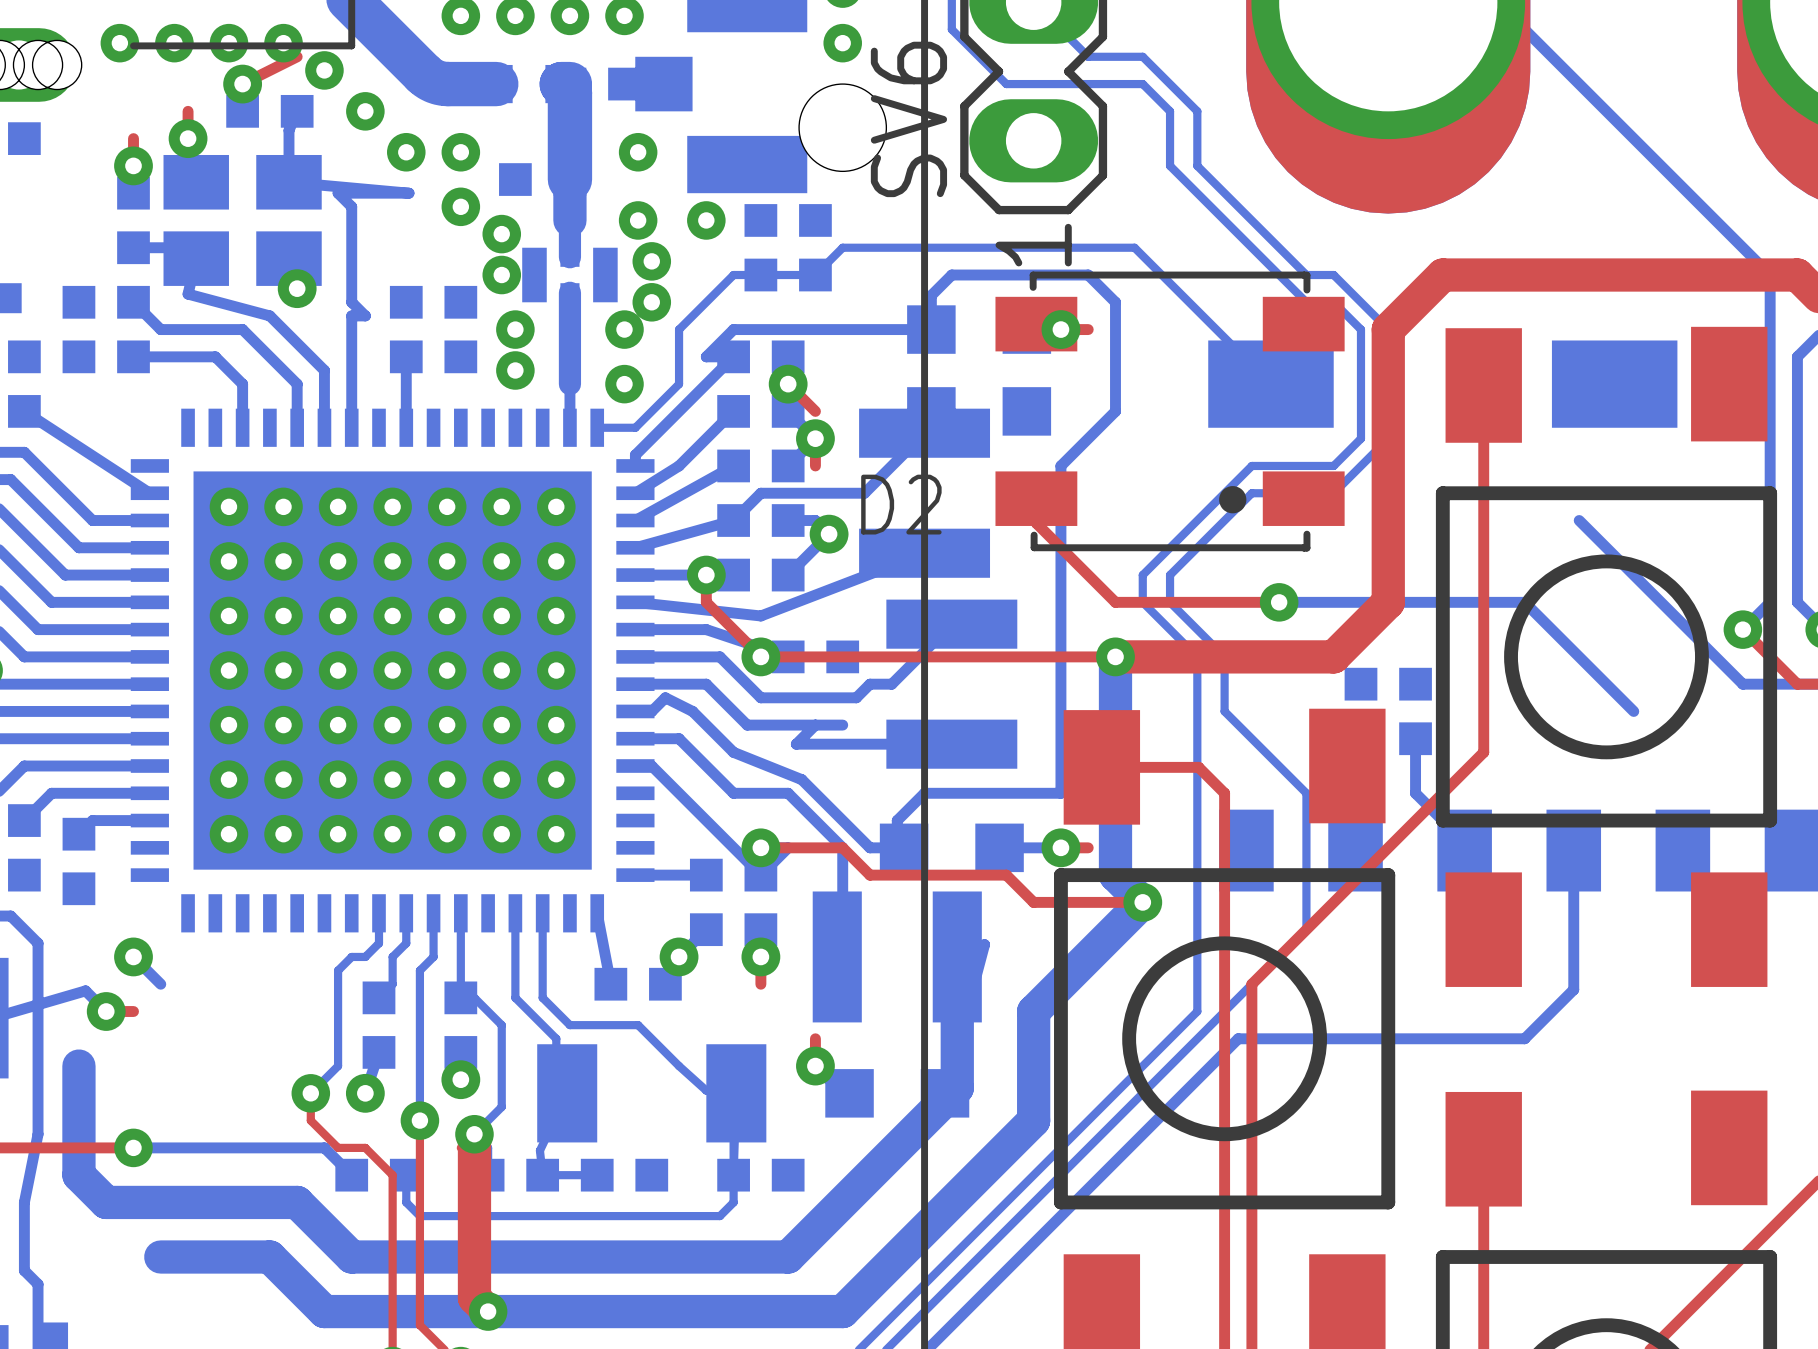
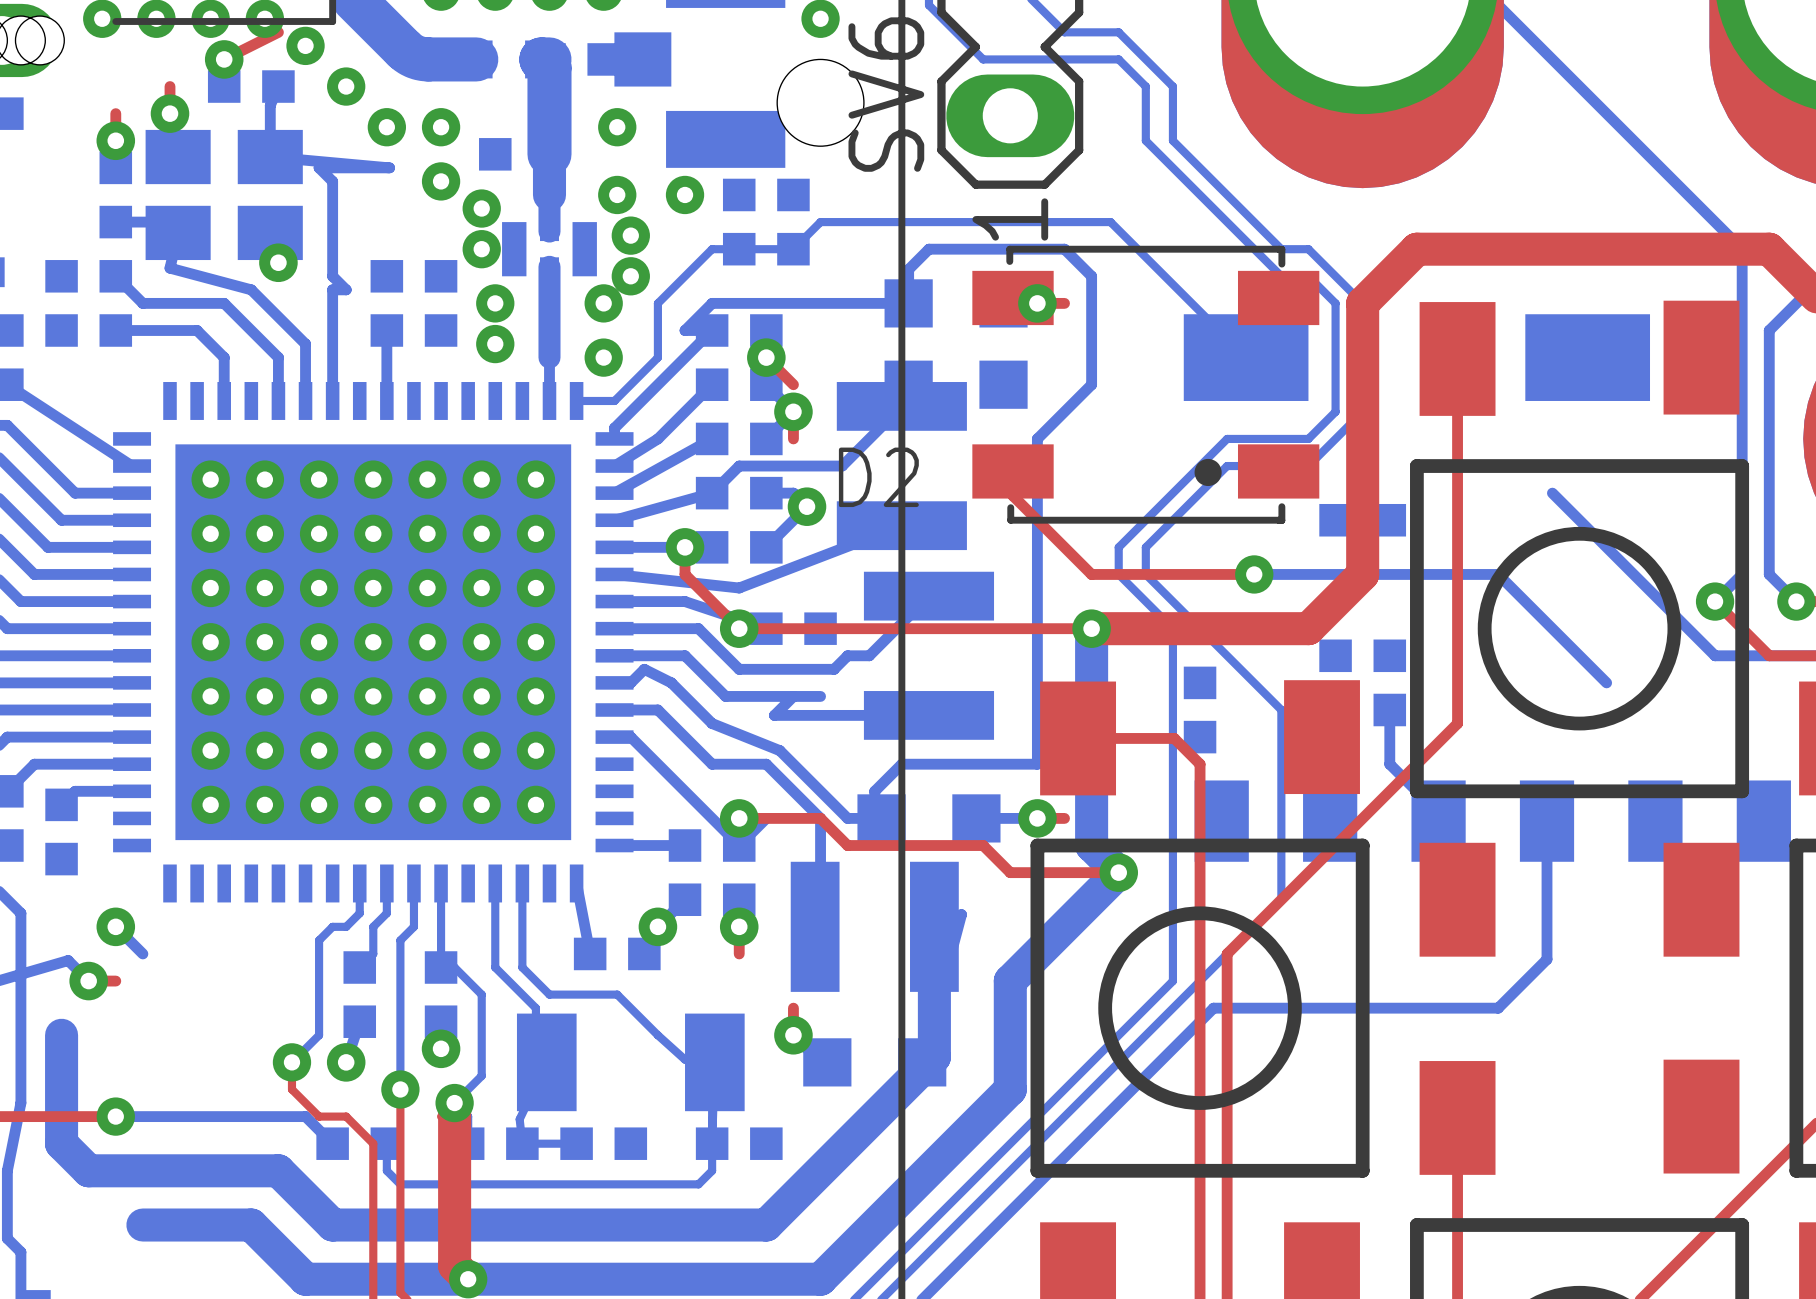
part: none -> (1362, 520)
bottom track: (1224, 656) (1224, 711) (1306, 793) -> (1200, 628) (1281, 709) (1281, 764)
part: none -> (1200, 709)

